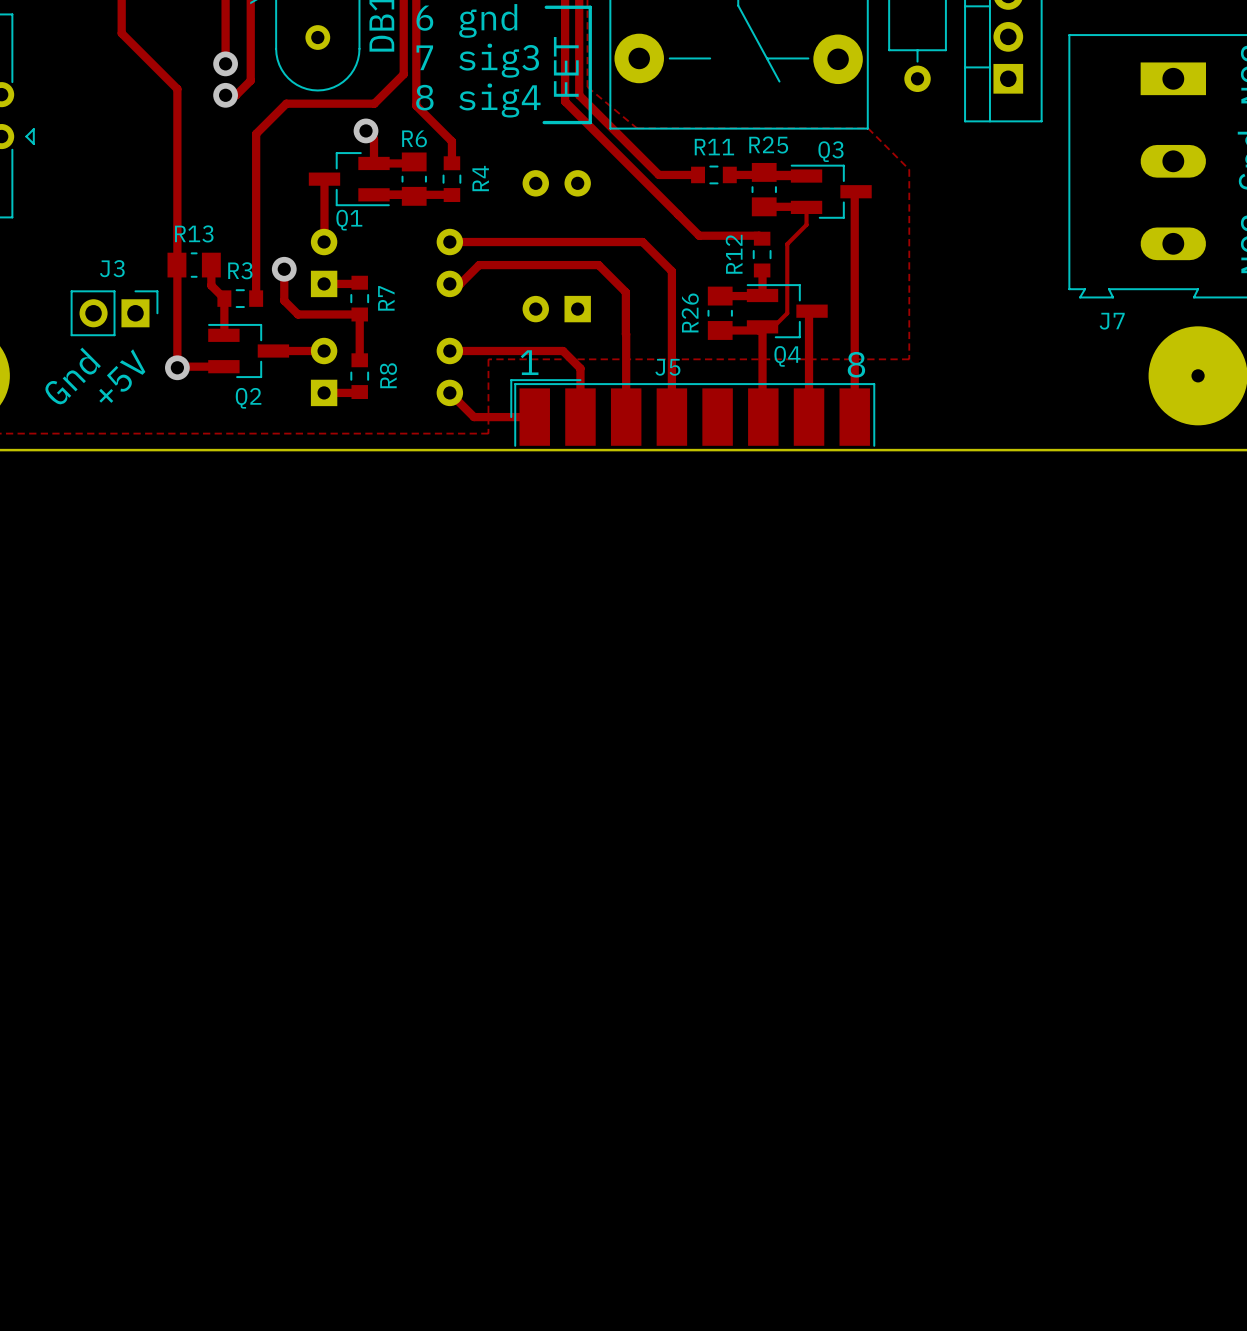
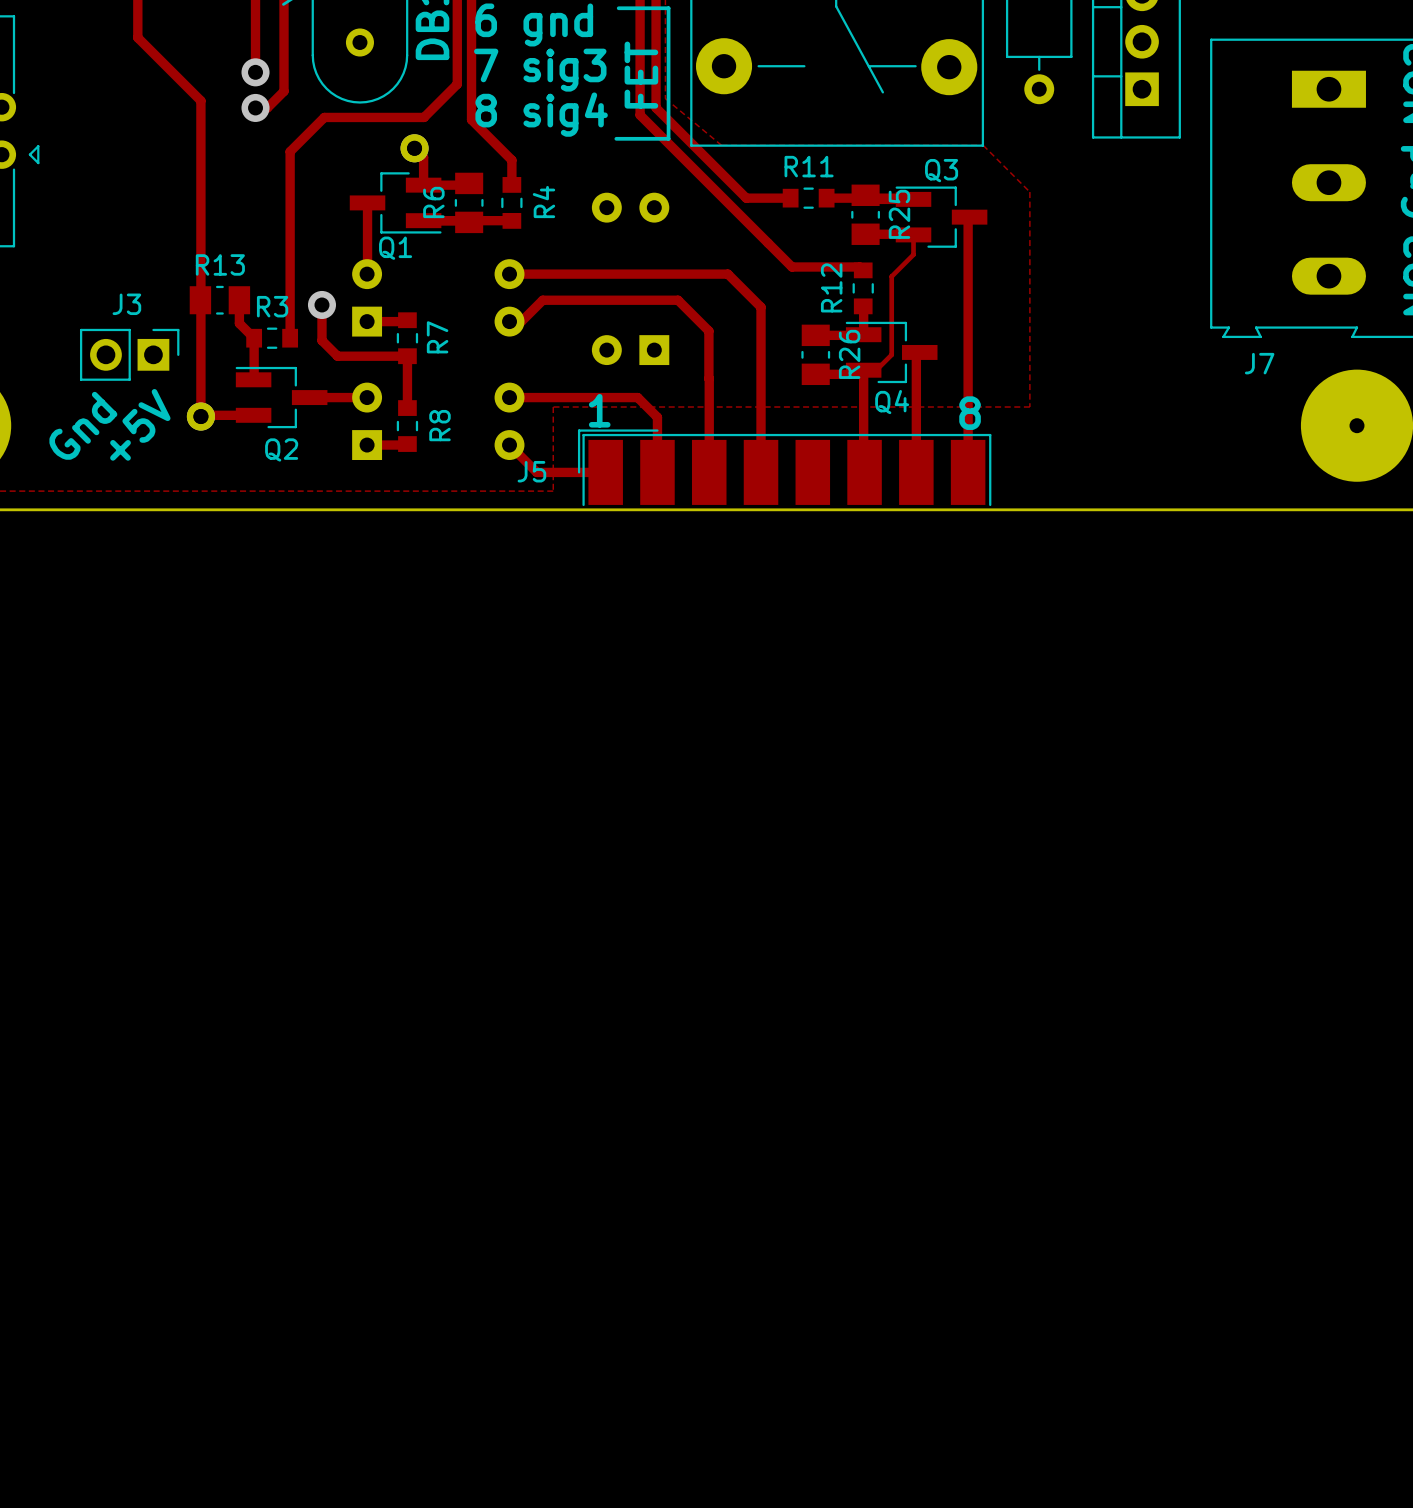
part: none -> (414, 148)
R6 name rotation: 0° (414, 138) -> 90° counterclockwise (433, 202)
R6 name position: R6 (414, 138) -> R6 (433, 202)
R25 name rotation: 0° (768, 144) -> 90° counterclockwise (899, 214)
R26 name position: R26 (690, 312) -> R26 (849, 354)
part: none -> (200, 416)
J5 name position: J5 (667, 367) -> J5 (531, 471)

